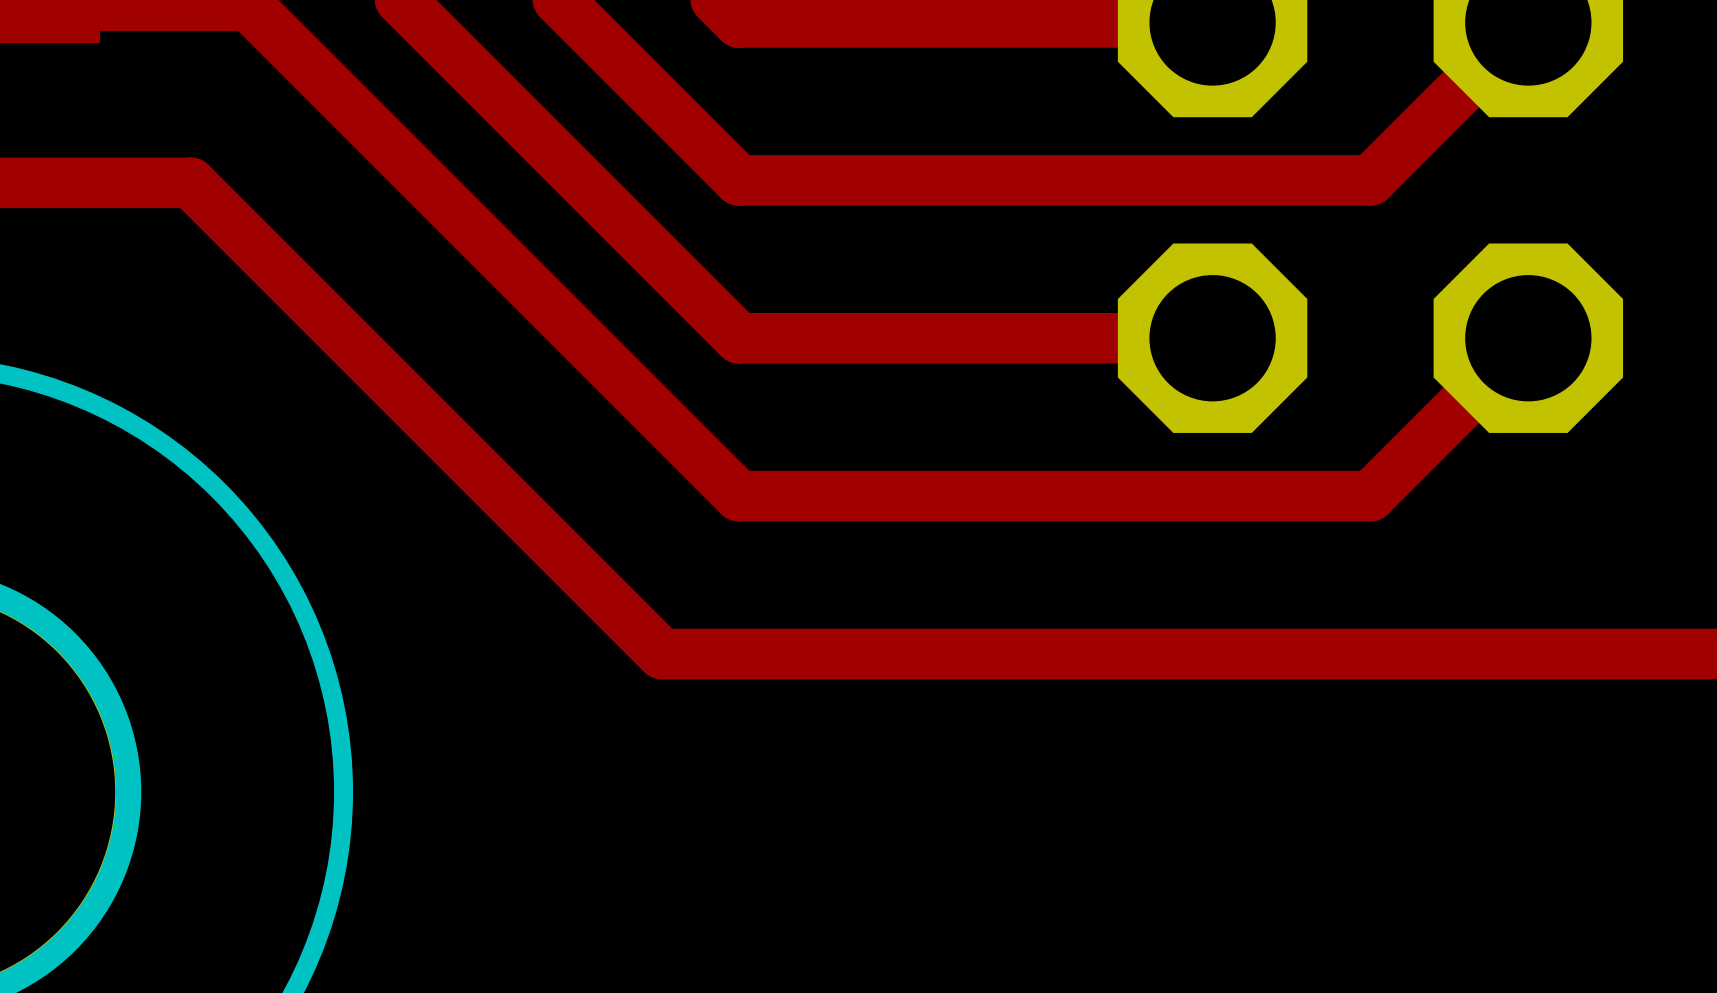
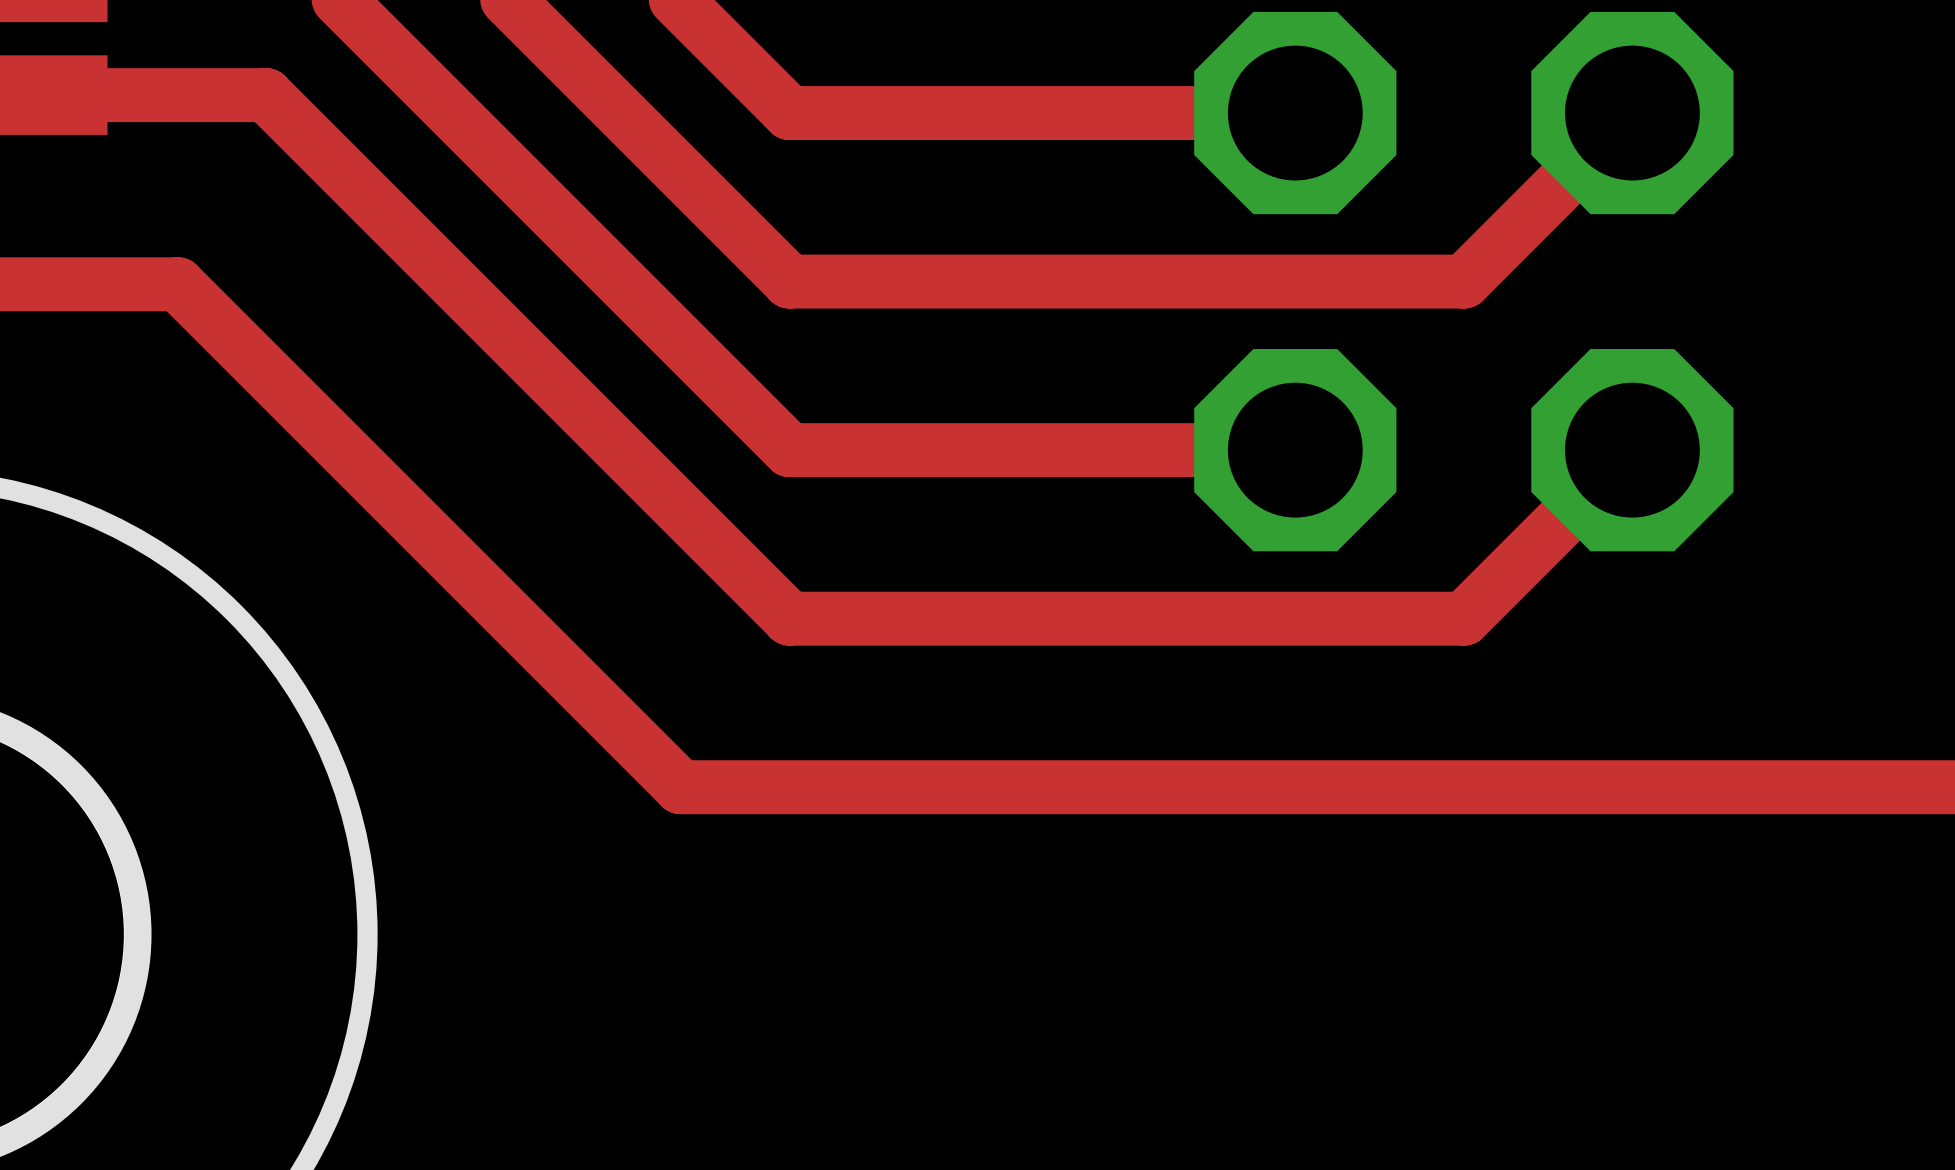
track: (165, 182) (190, 182) (661, 653) -> (177, 284) (680, 787) (707, 787)

